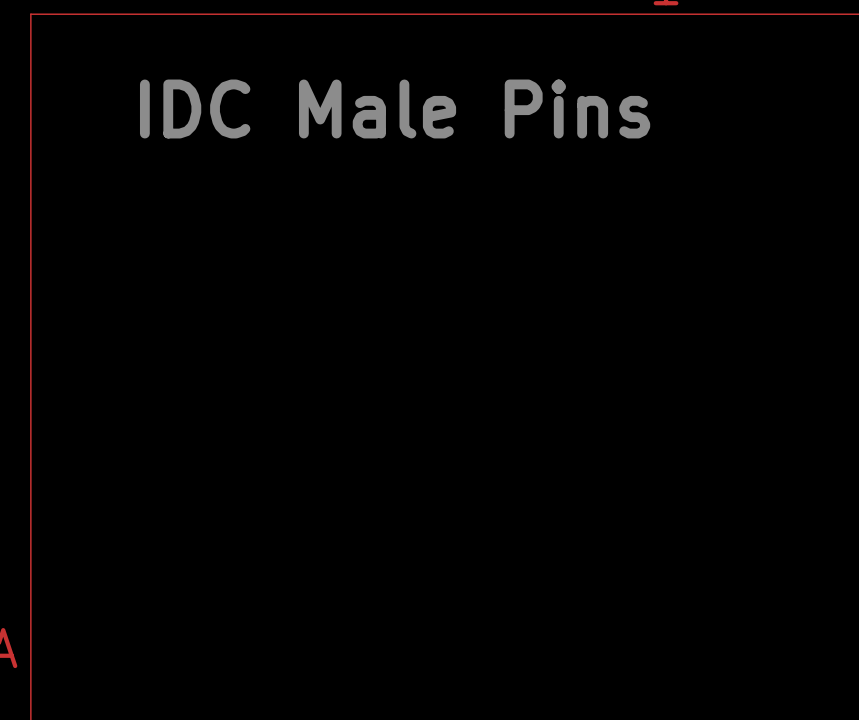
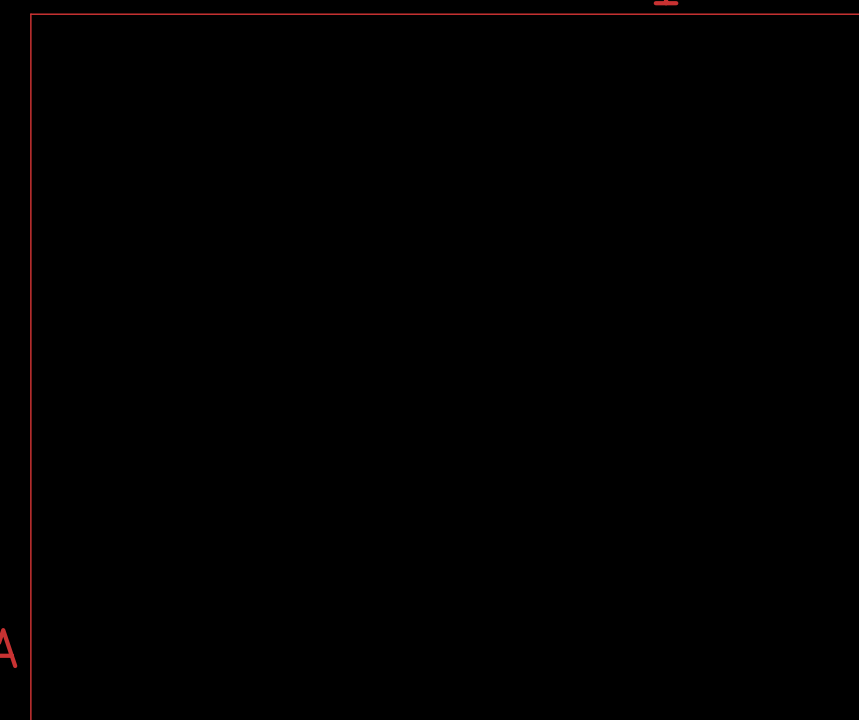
text: IDC Male Pins (395, 108) -> none

